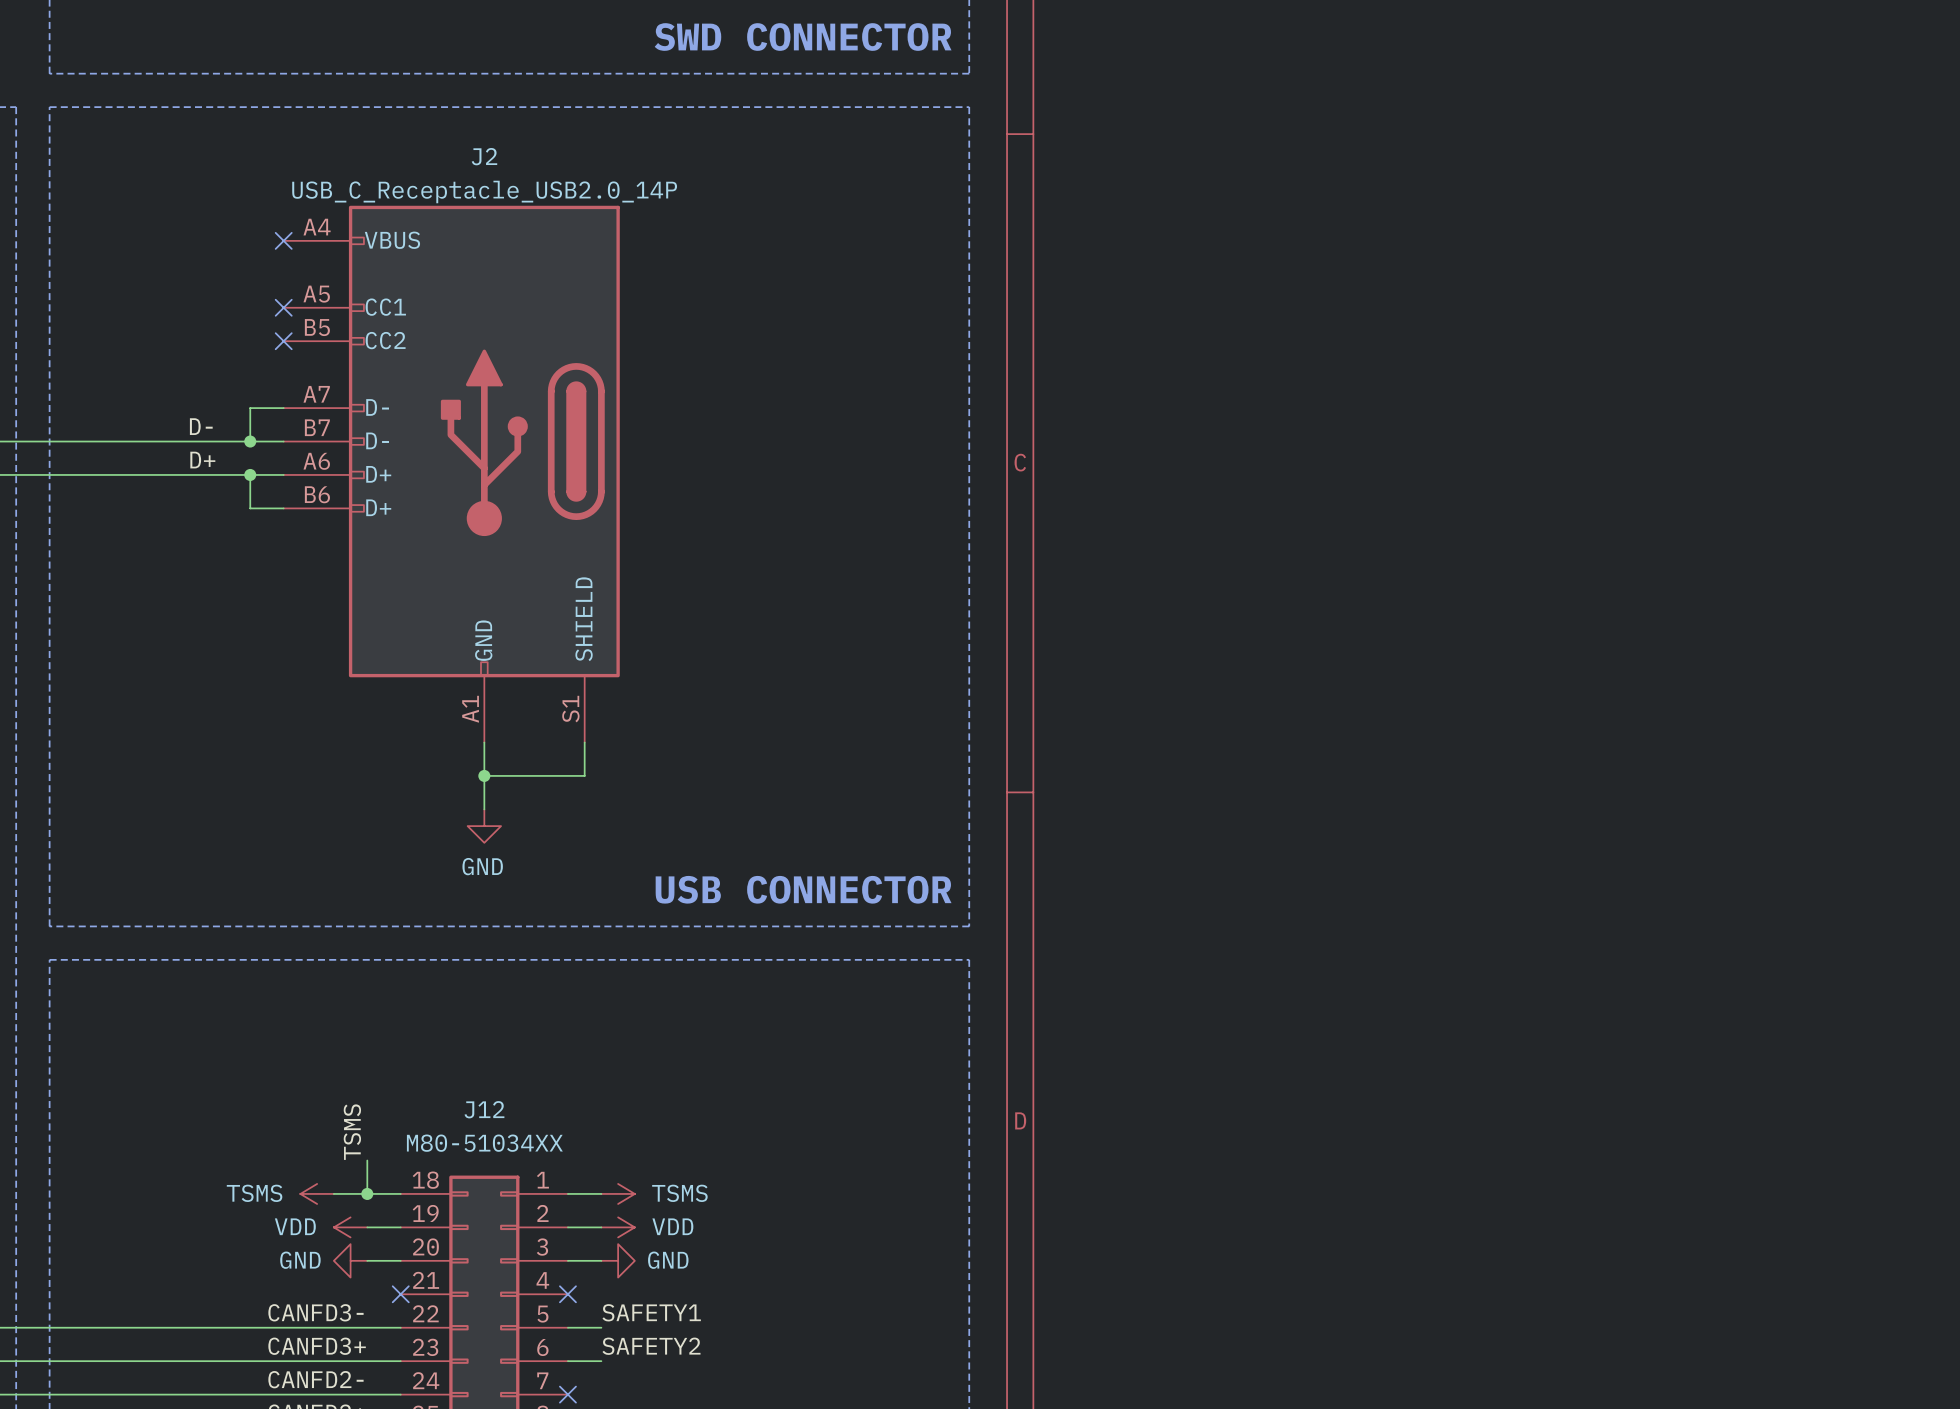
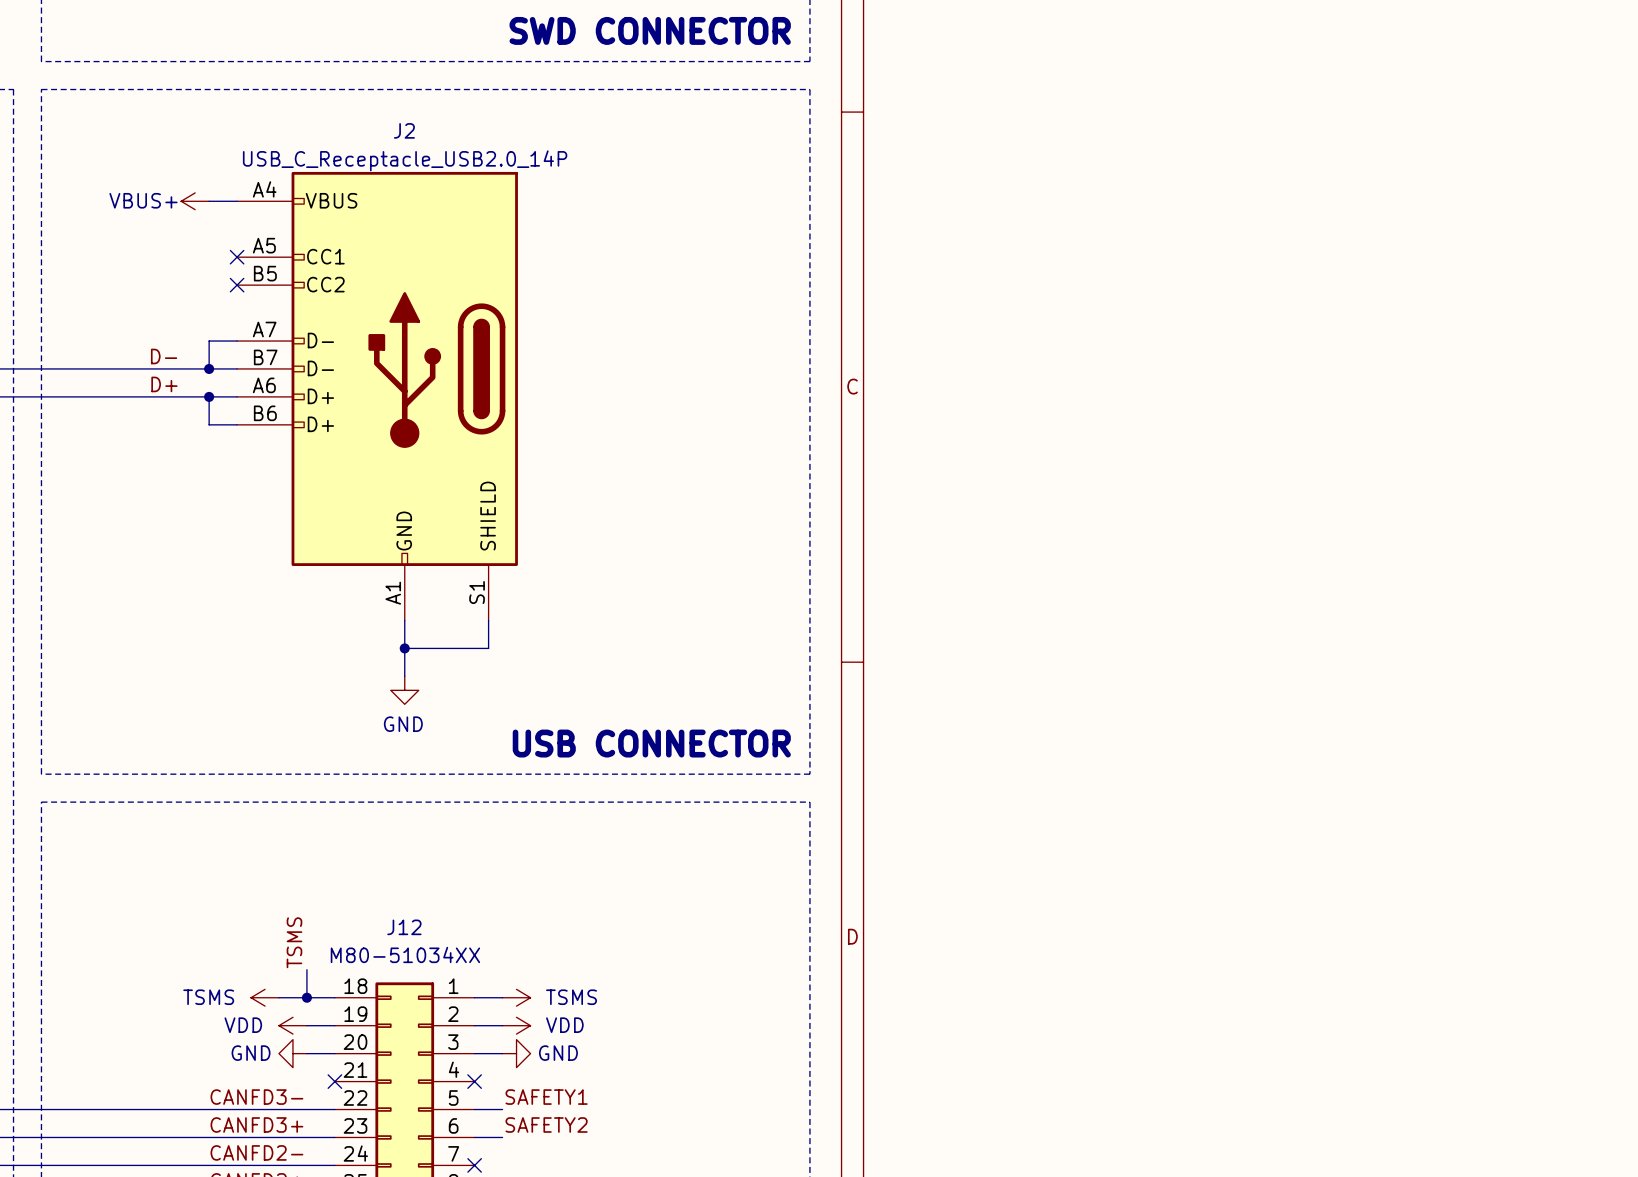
power symbol: none -> VBUS+ (195, 201)
wire: none -> (209, 201) (237, 201)
no-connect mark: (283, 240) -> none

